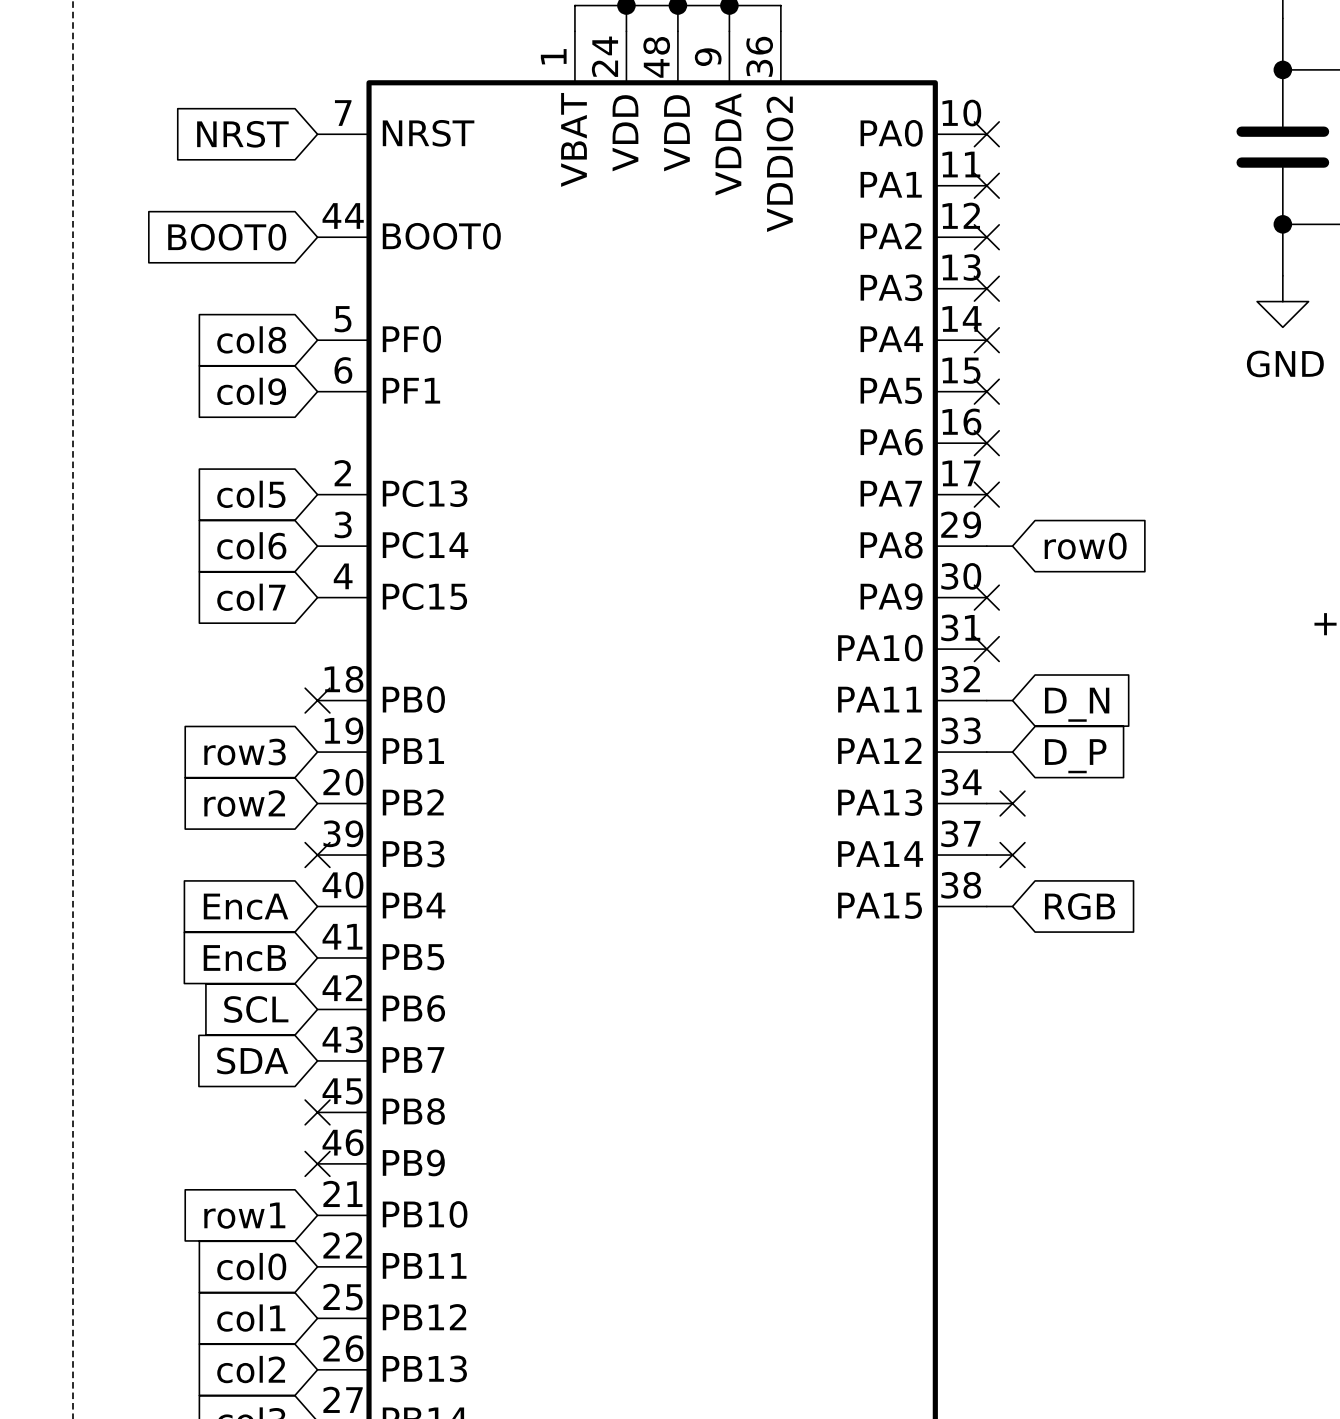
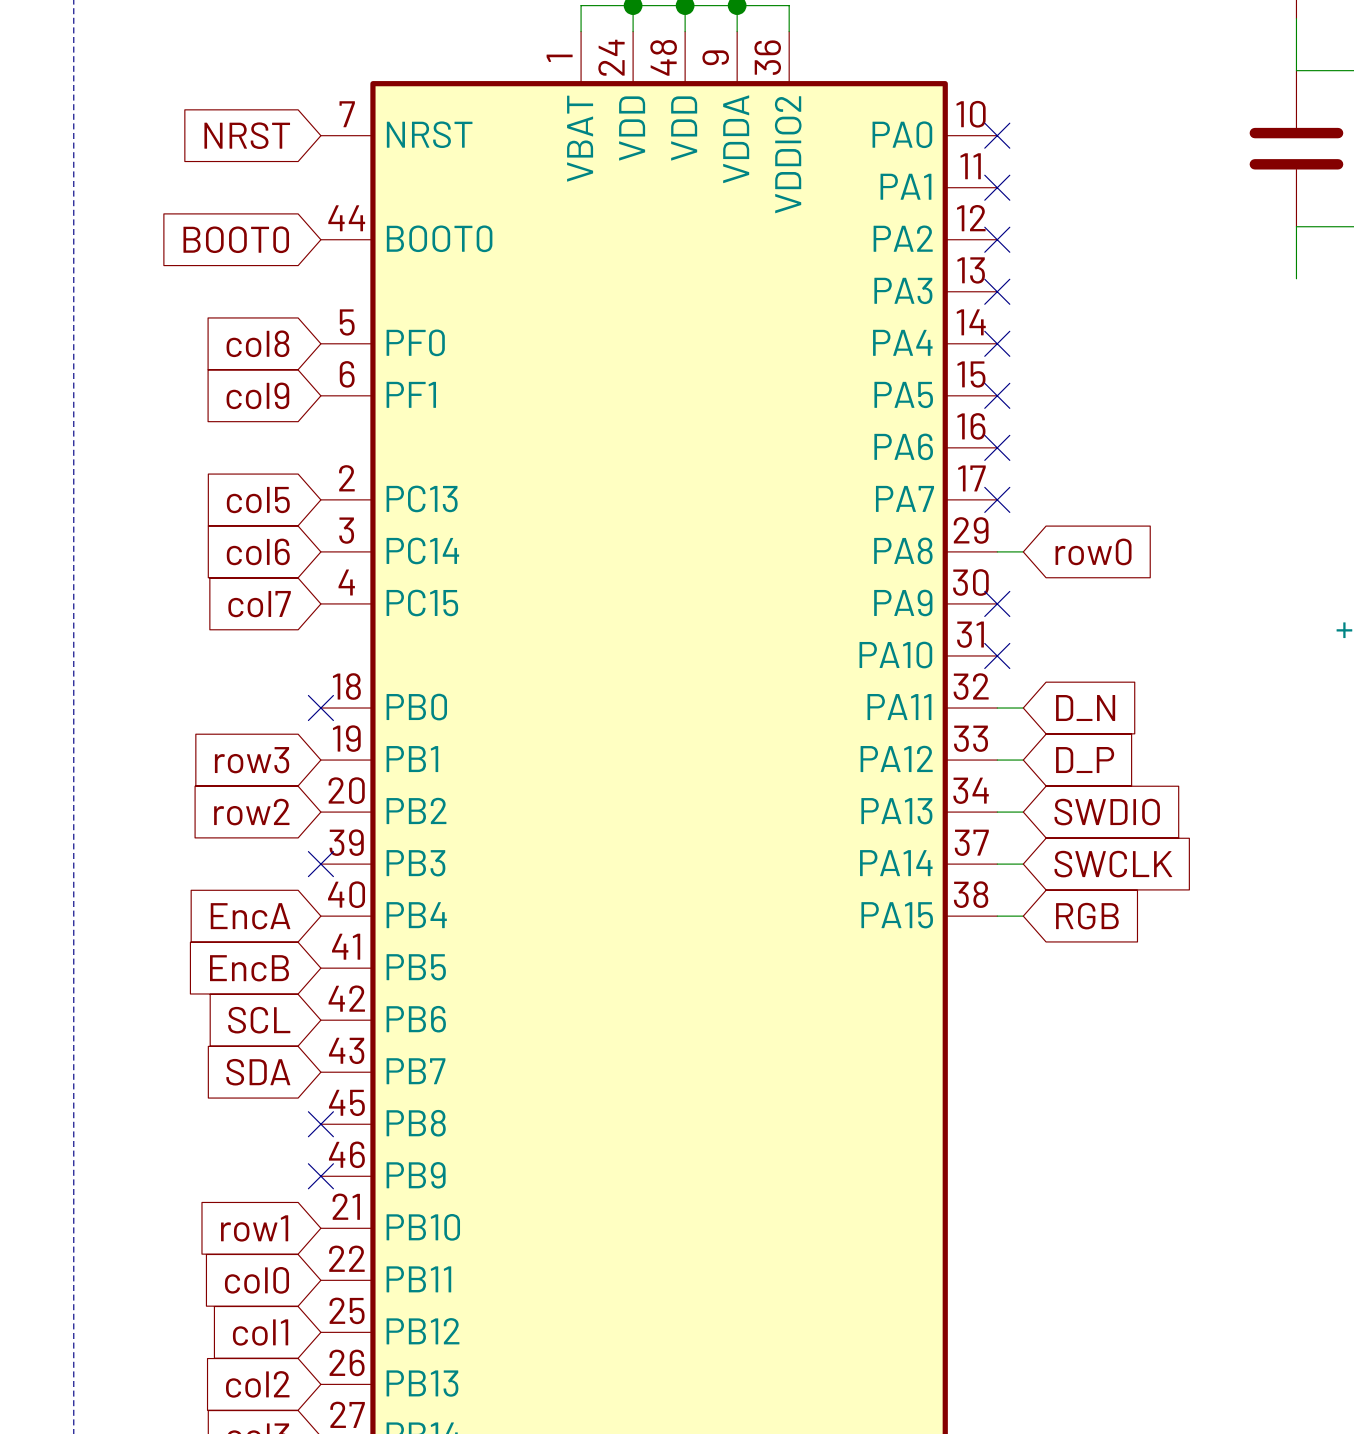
junction: (1282, 69) -> none
junction: (1282, 224) -> none
power symbol: GND (1282, 301) -> none
no-connect mark: (1012, 803) -> none
global label: none -> SWDIO (1107, 812)
no-connect mark: (1012, 855) -> none
global label: none -> SWCLK (1113, 864)

